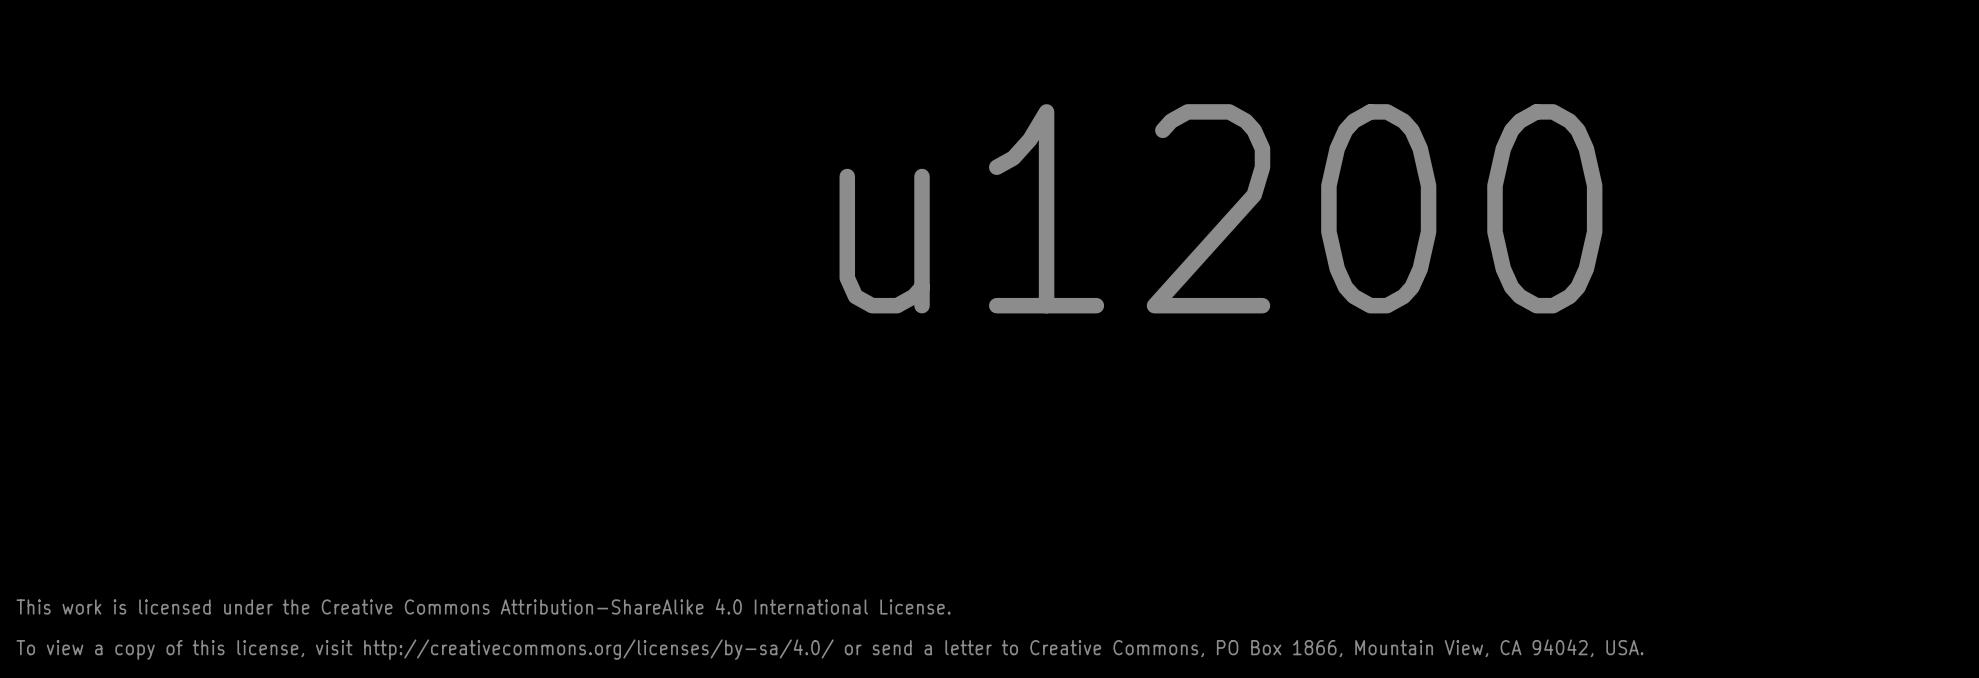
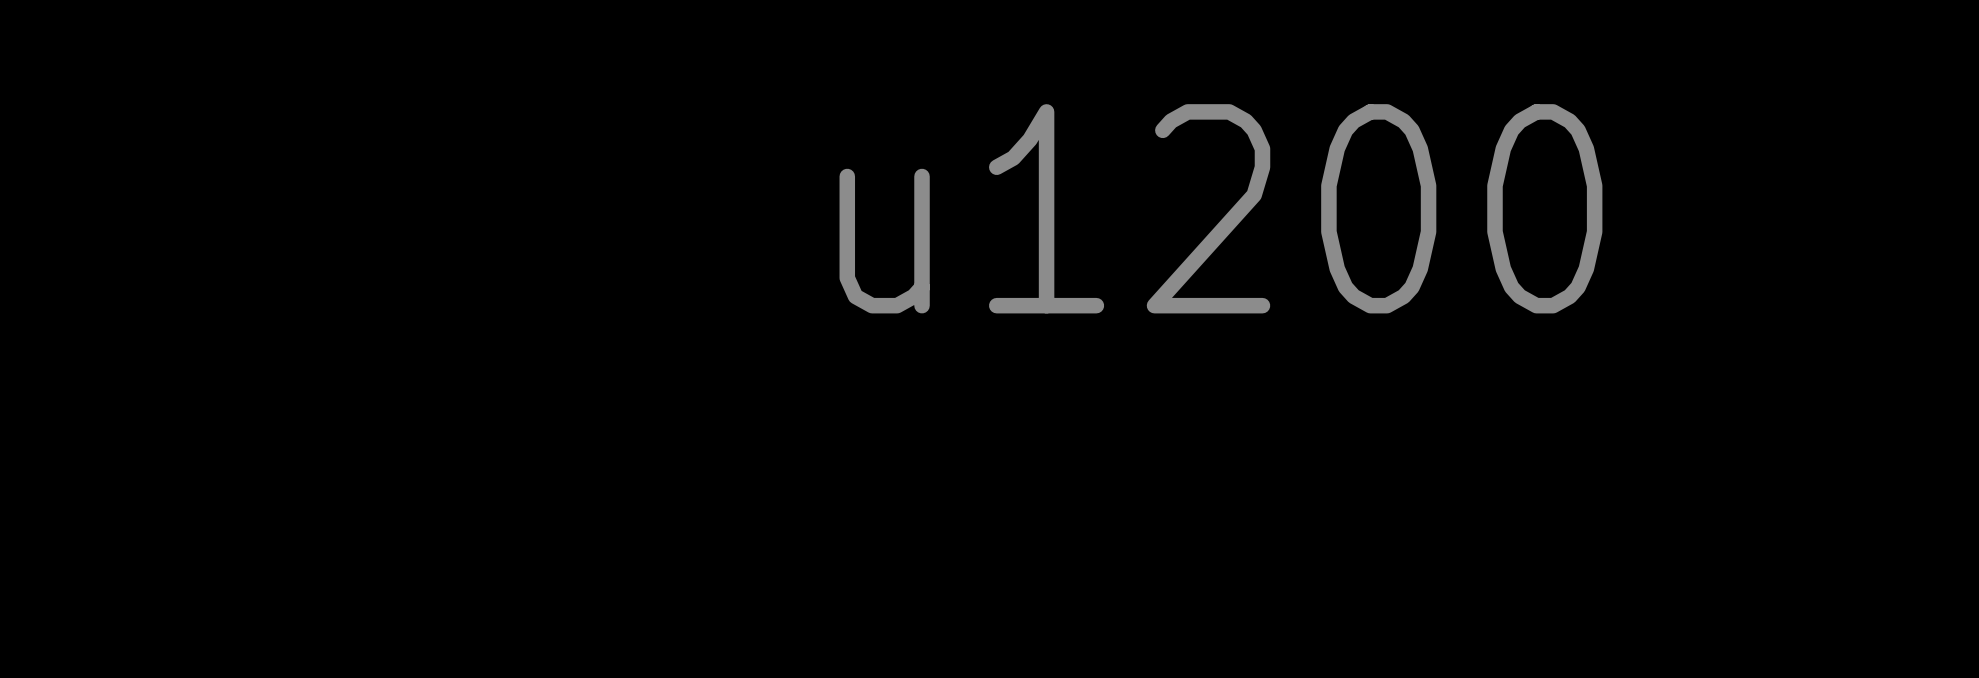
text: This work is licensed under the Creative Commons Attribution-ShareAlike 4.0 International License. (483, 606) -> none
text: To view a copy of this license, visit http://creativecommons.org/licenses/by-sa/4.0/ or send a letter to Creative Commons, PO Box 1866, Mountain View, CA 94042, USA. (830, 649) -> none

